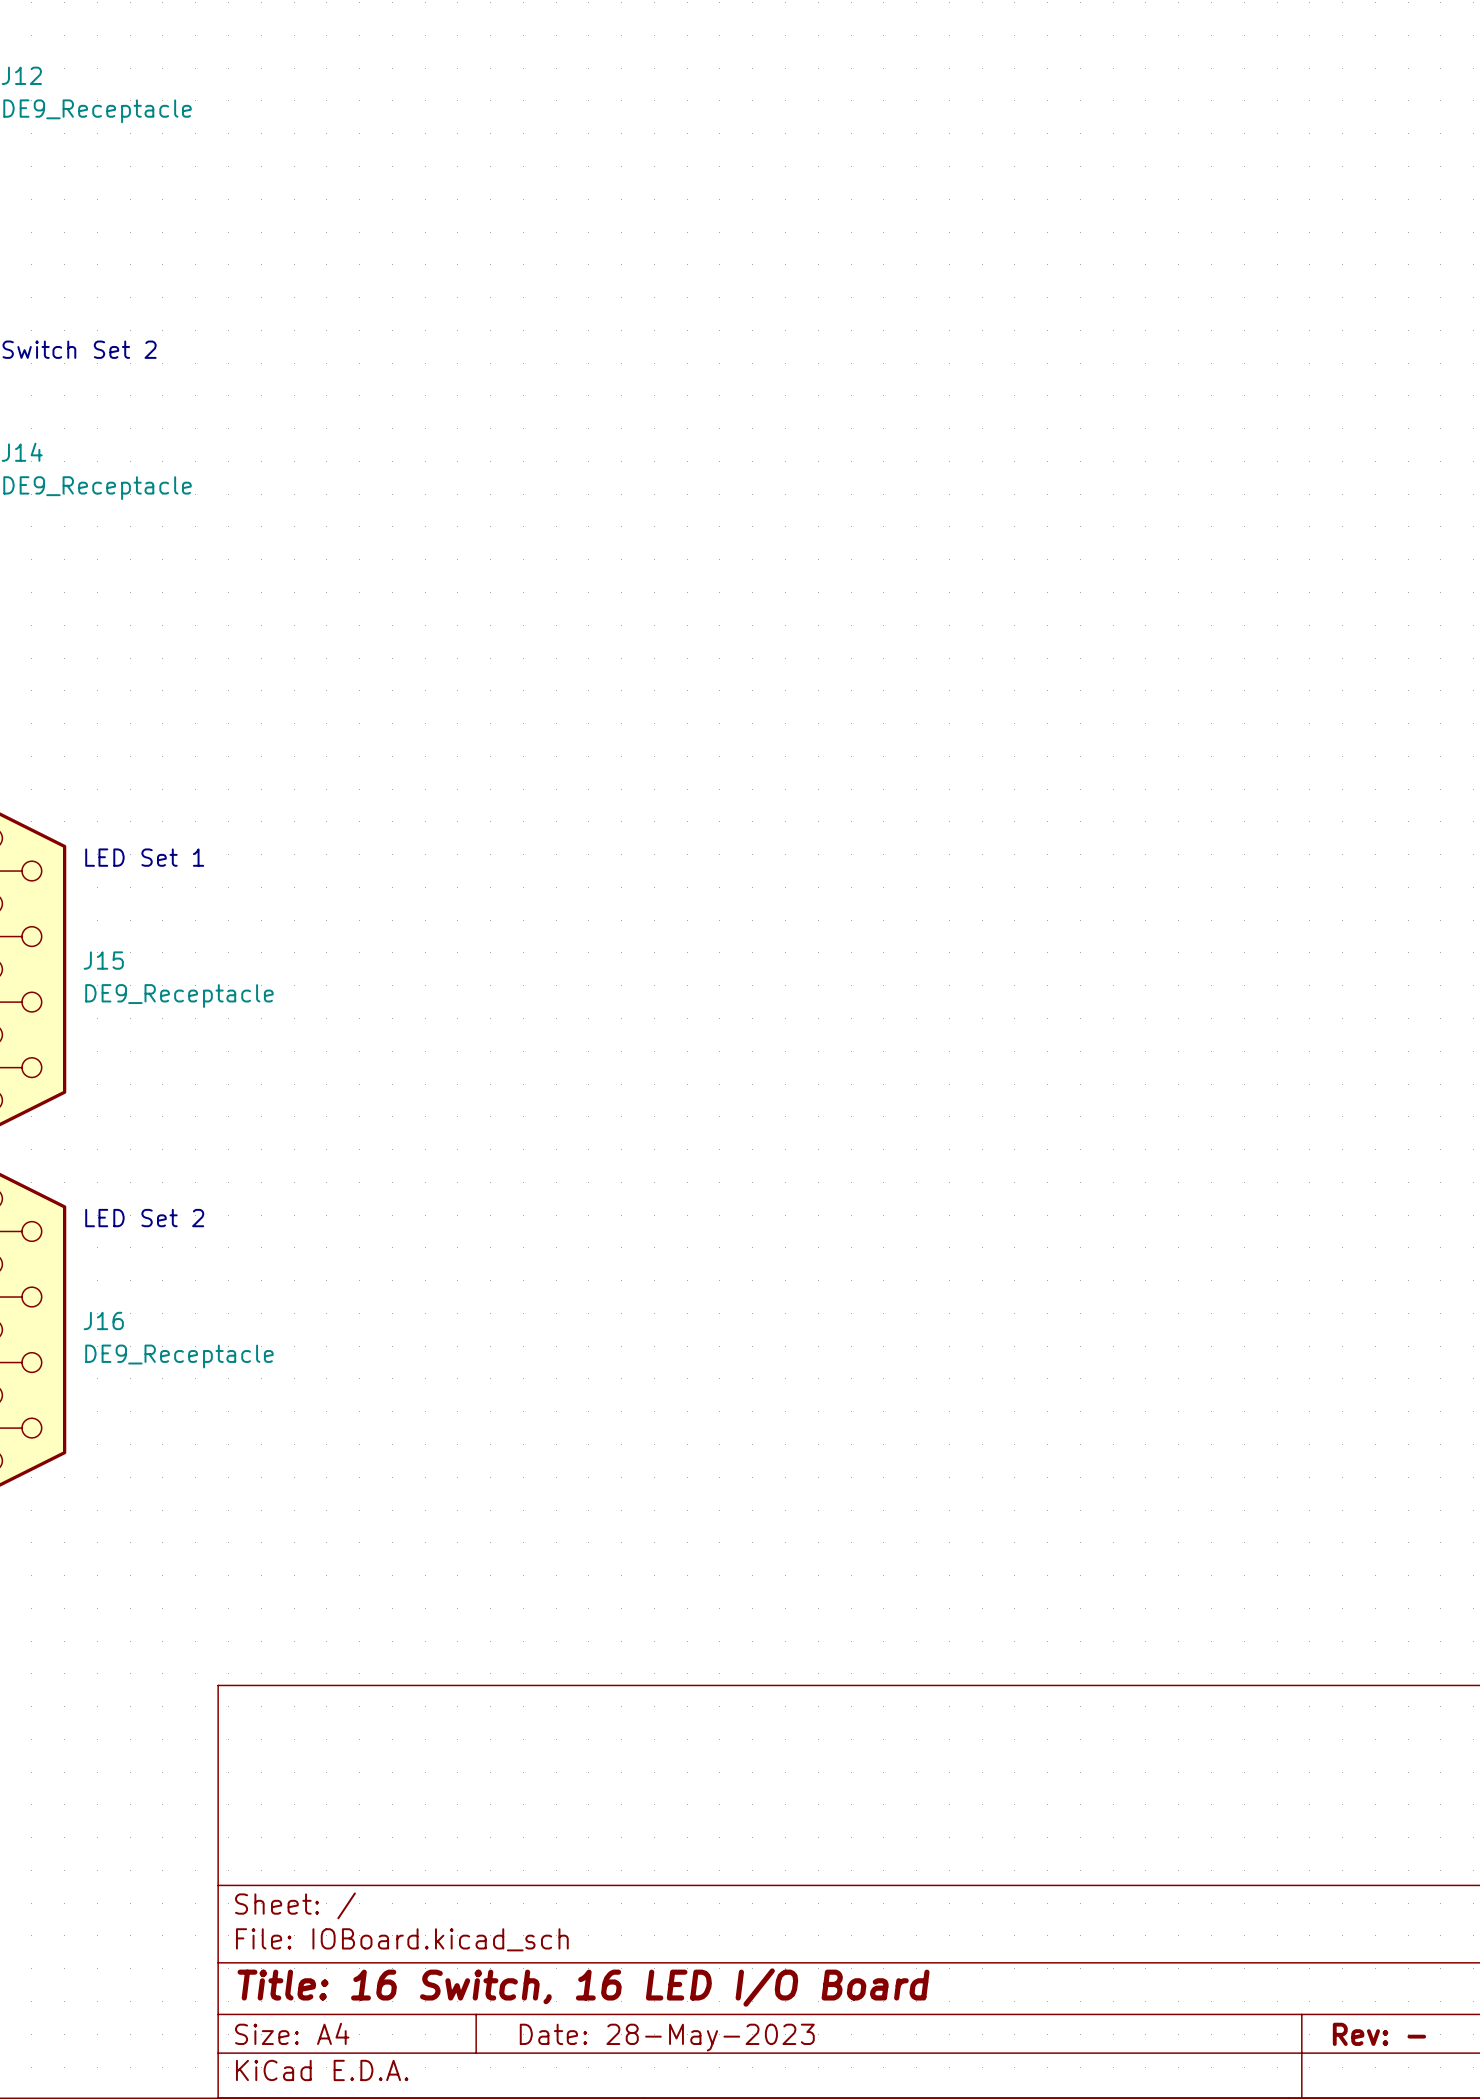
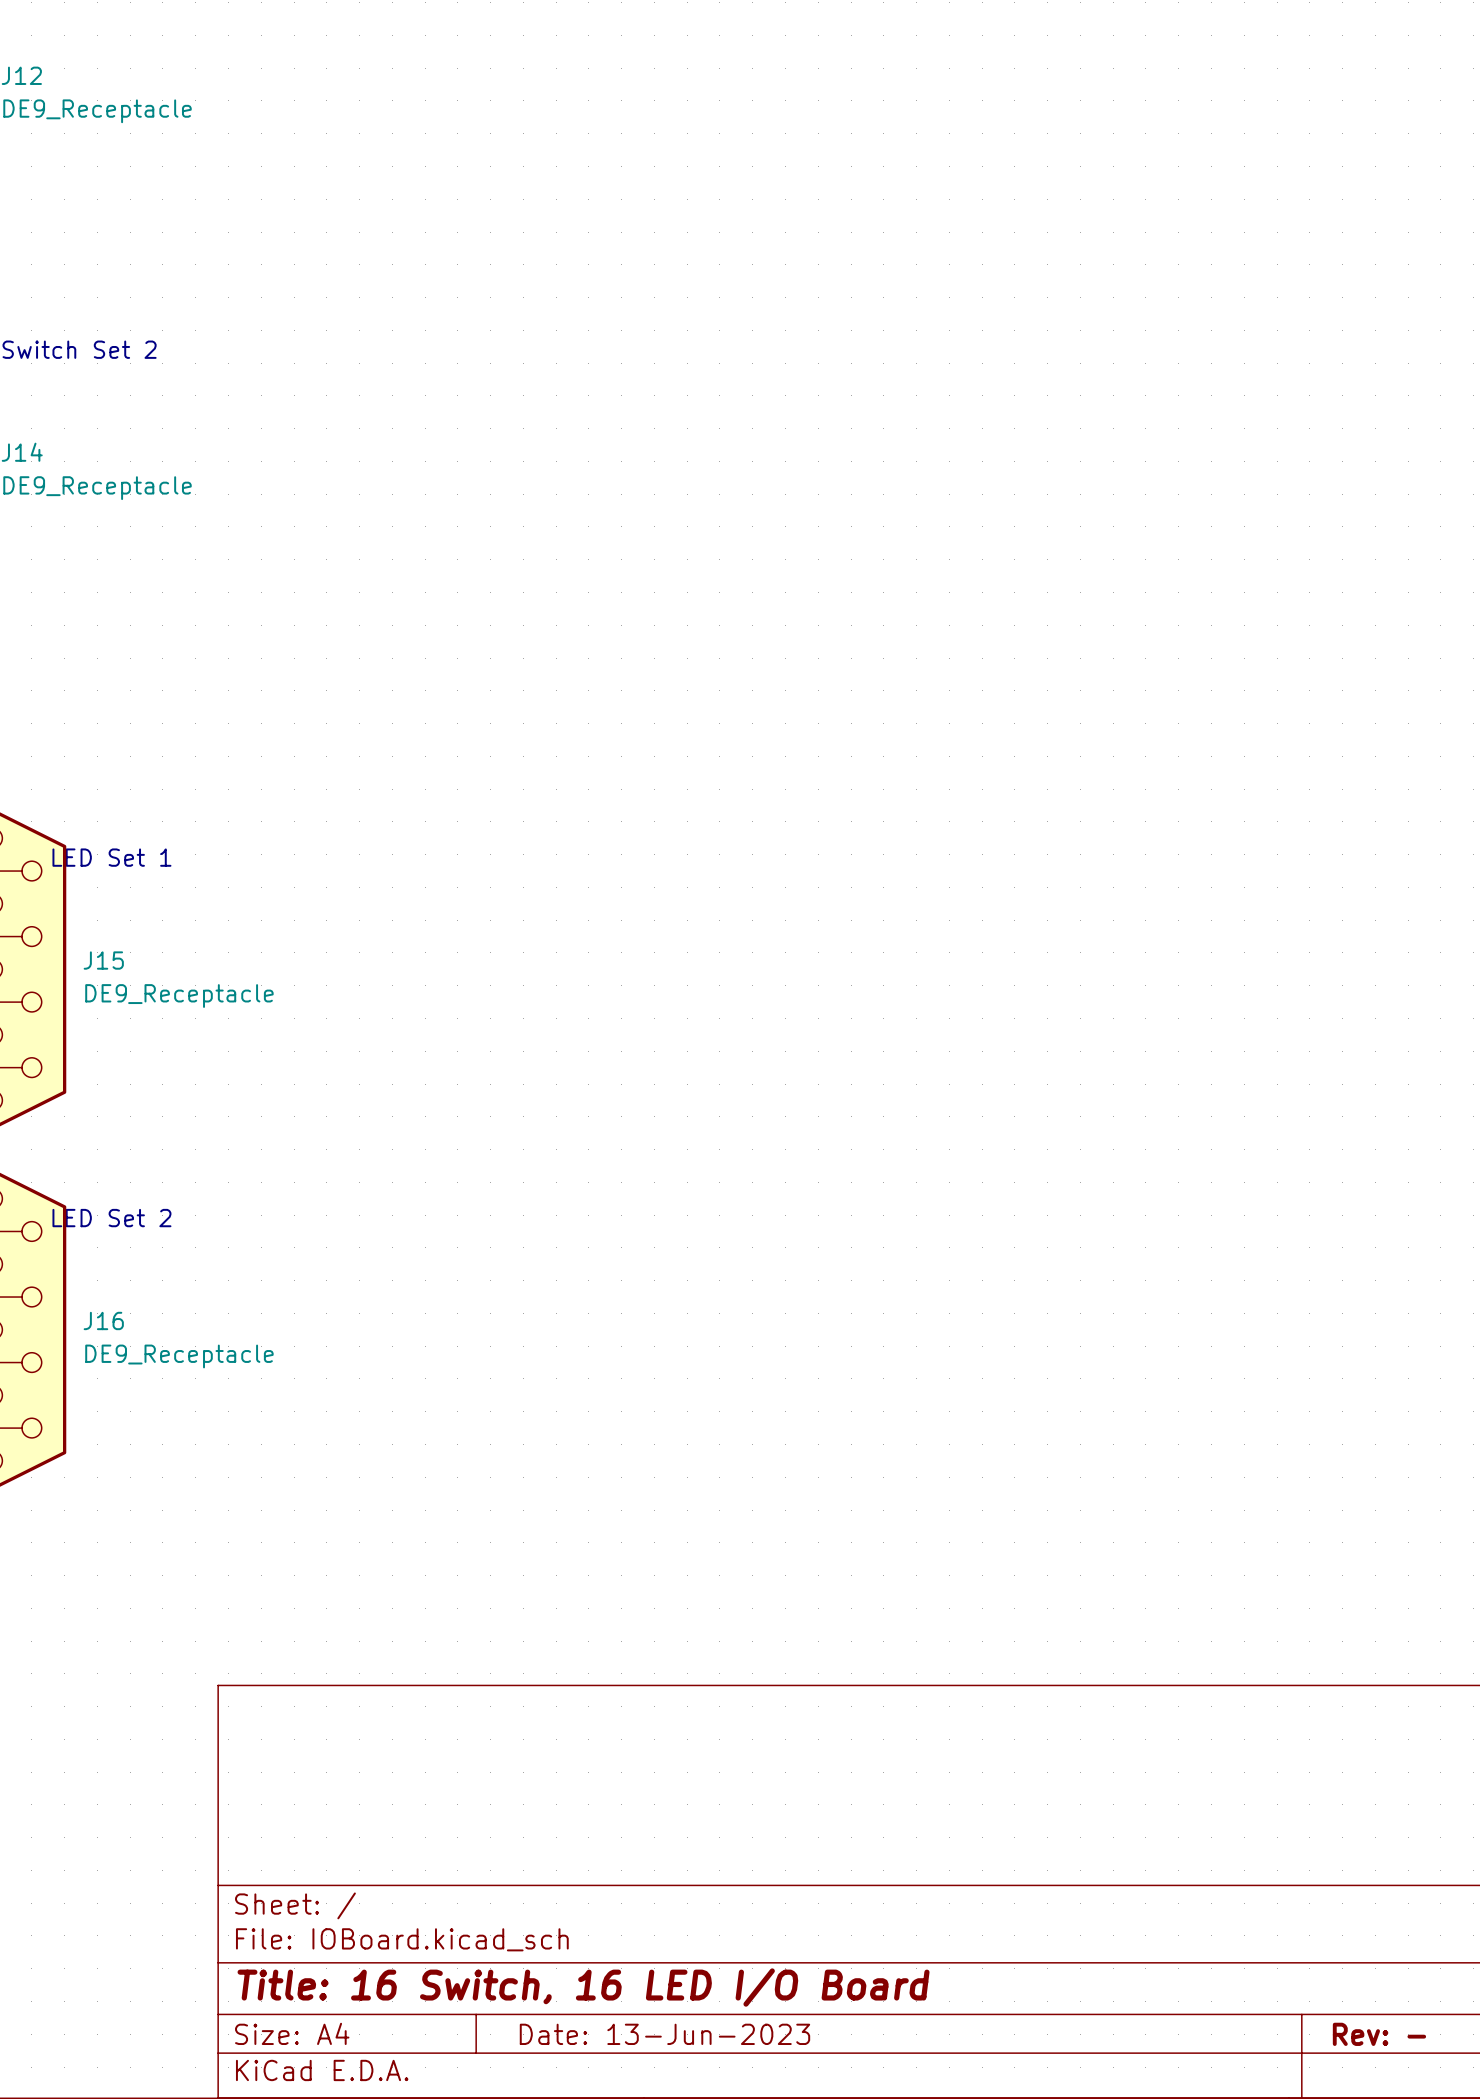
text position: LED Set 1 (144, 857) -> LED Set 1 (111, 857)
text position: LED Set 2 (144, 1218) -> LED Set 2 (111, 1218)
title block: Date: 28-May-2023 (667, 2037) -> Date: 13-Jun-2023 (664, 2034)

